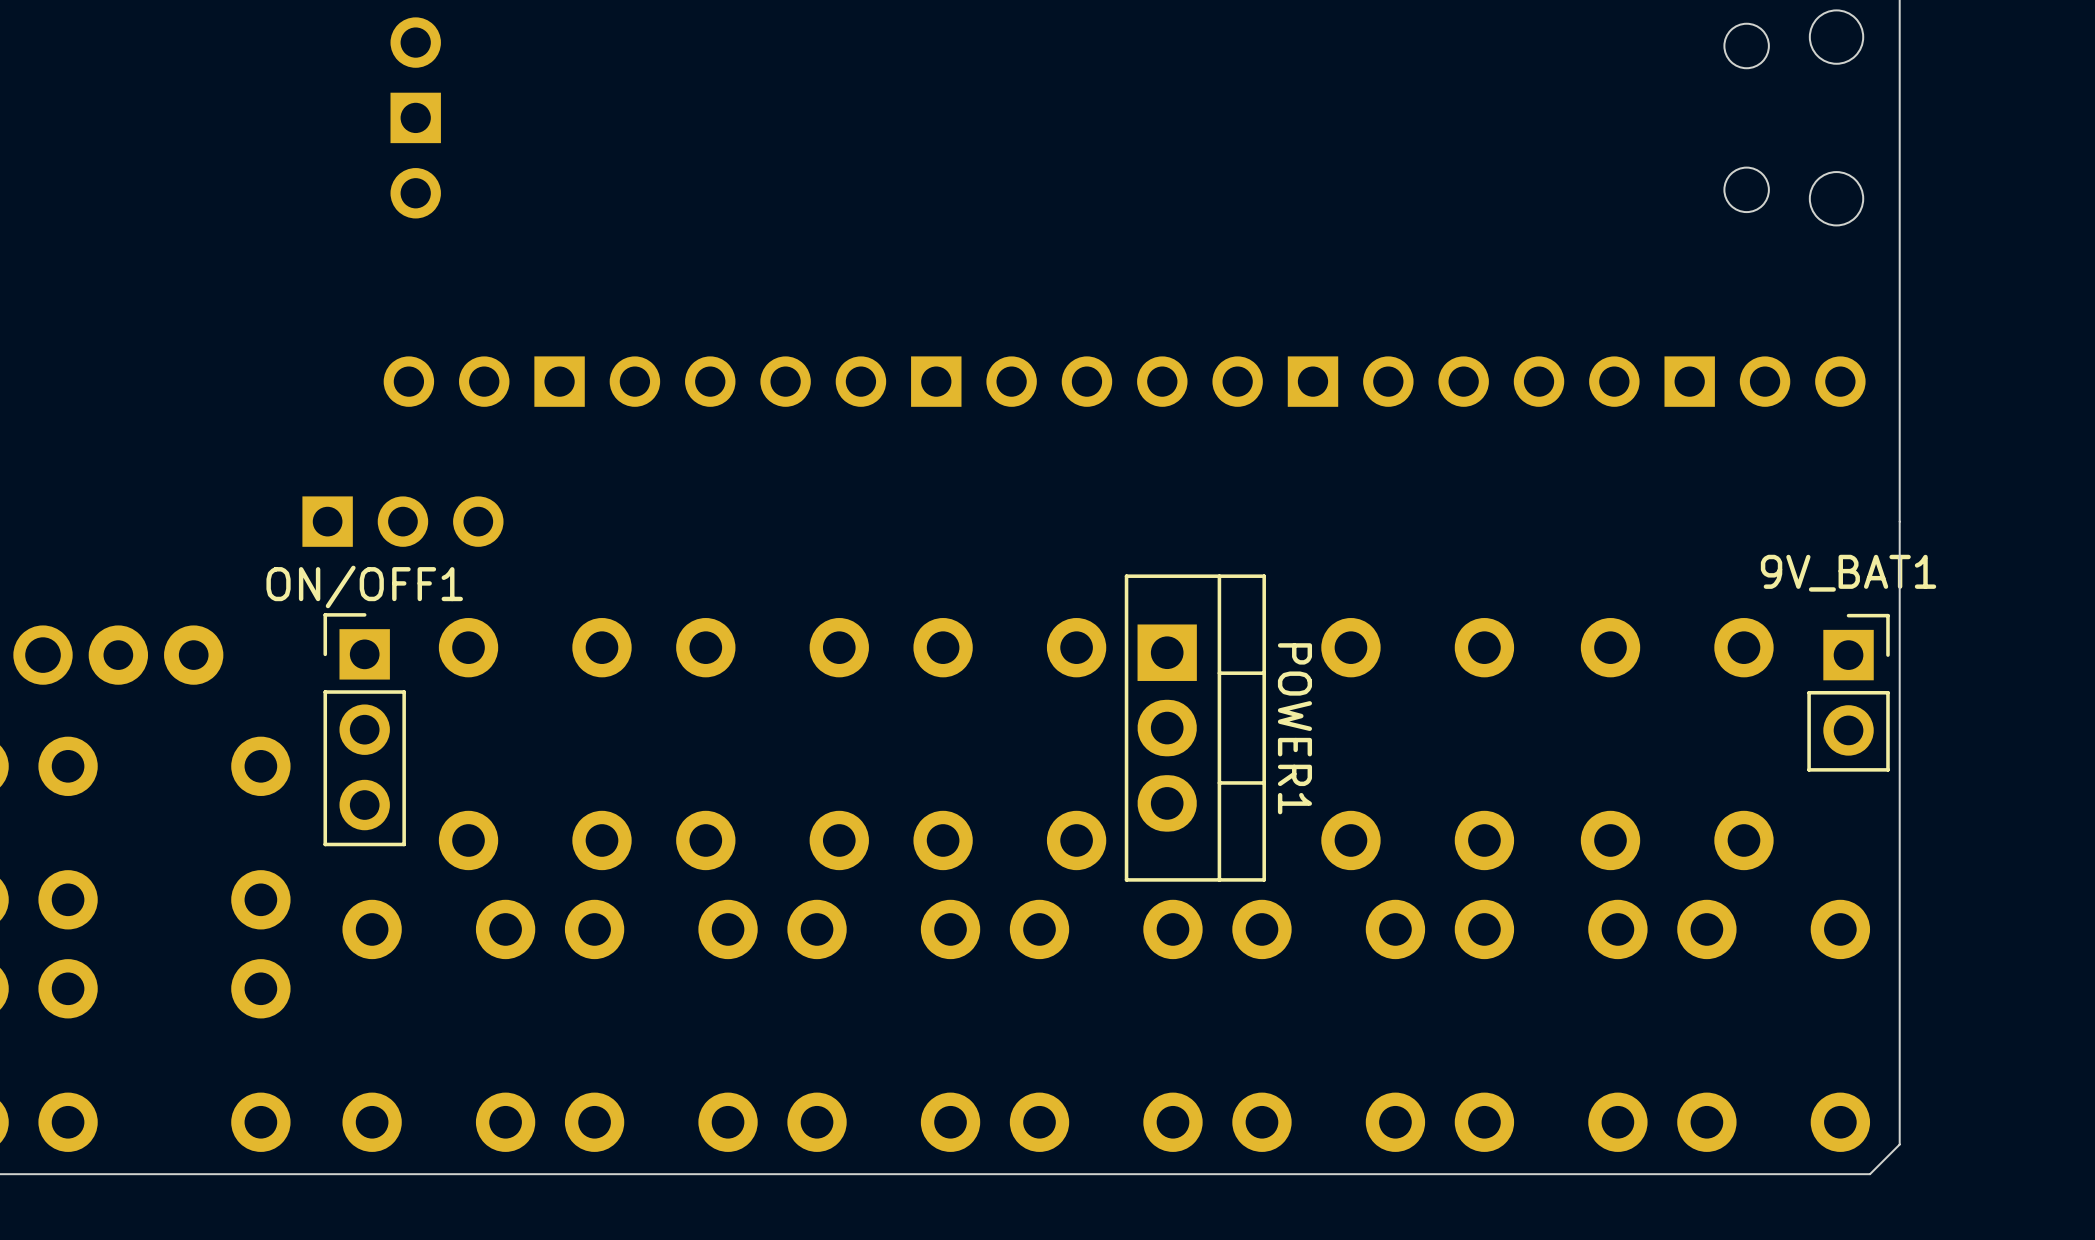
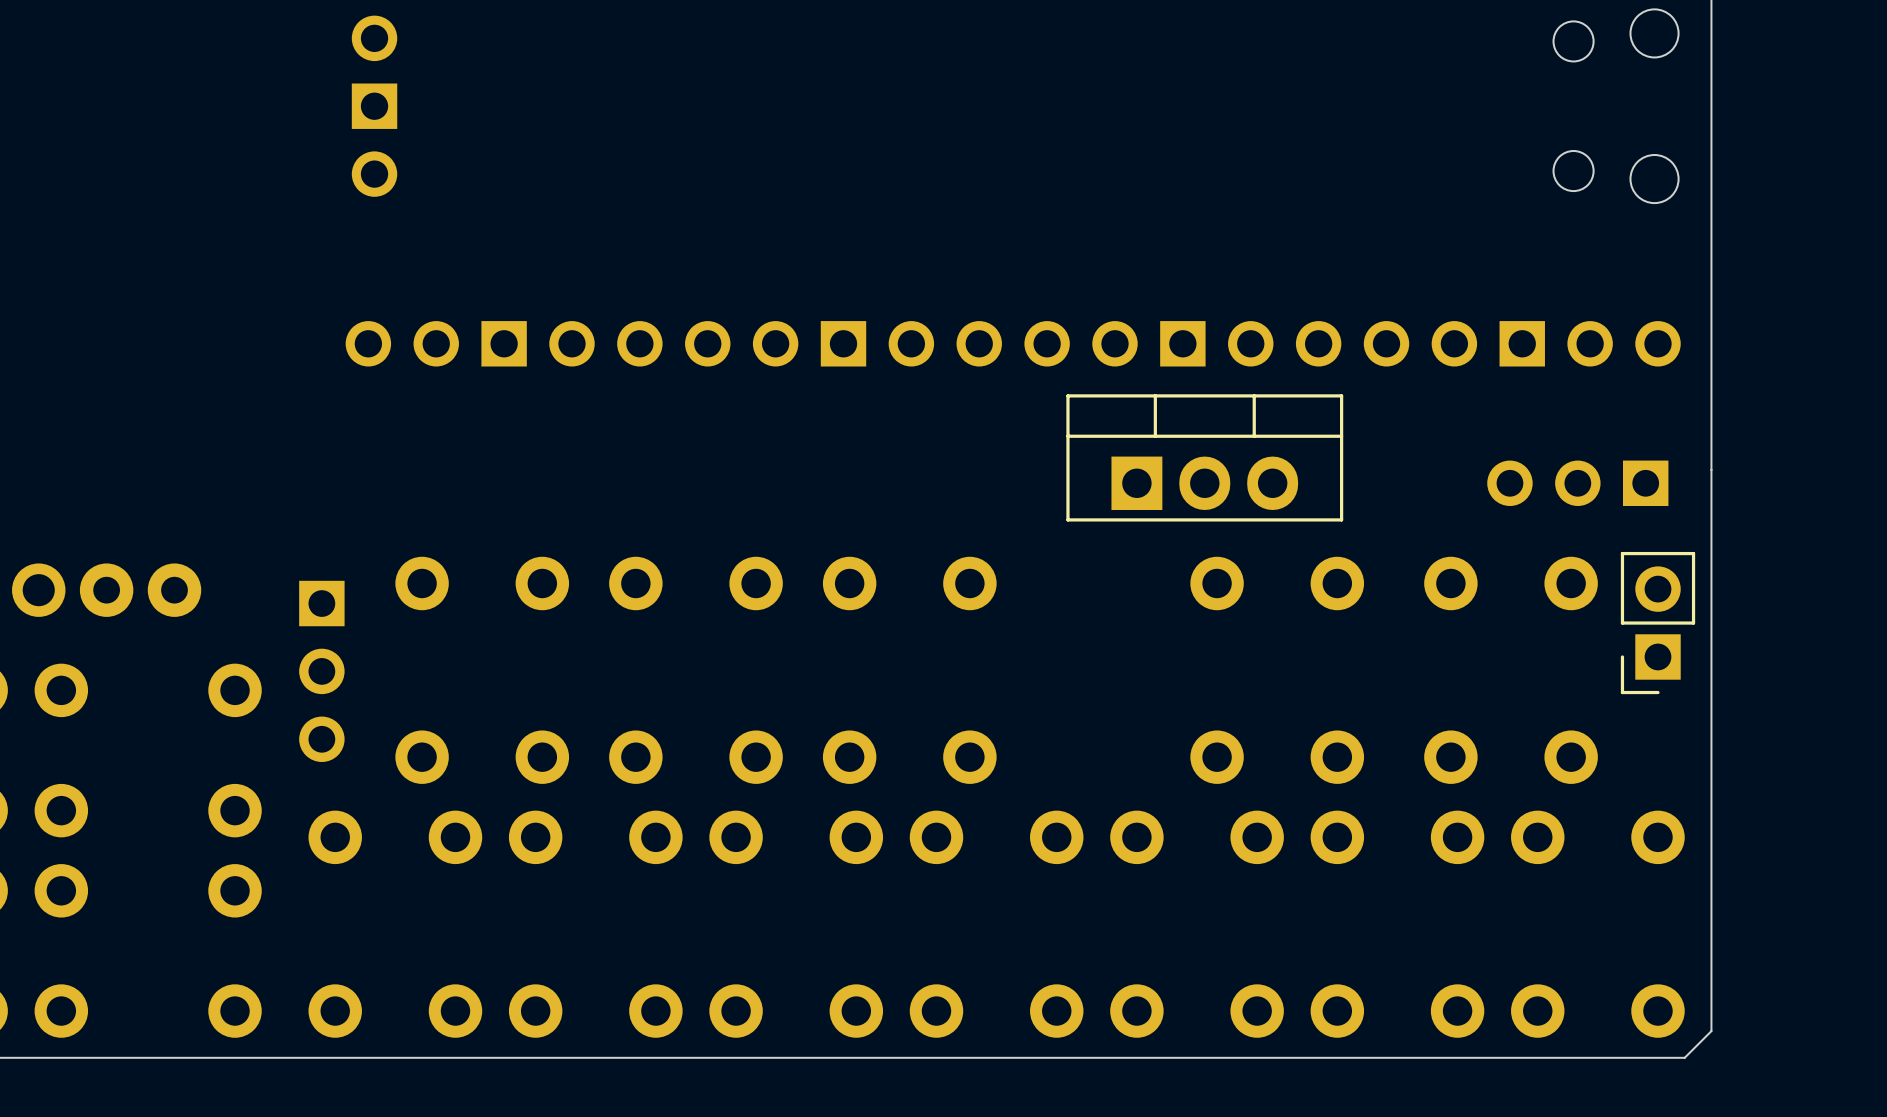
part: none -> (1204, 457)
part rotation: 0° (402, 521) -> 90° clockwise (321, 671)
part position: (402, 521) -> (321, 671)
part: none -> (1577, 483)
part: none -> (1658, 623)
9V_BAT1: (1848, 692) -> none
POWER1: (1195, 728) -> none
ON/OFF1: (364, 729) -> none

